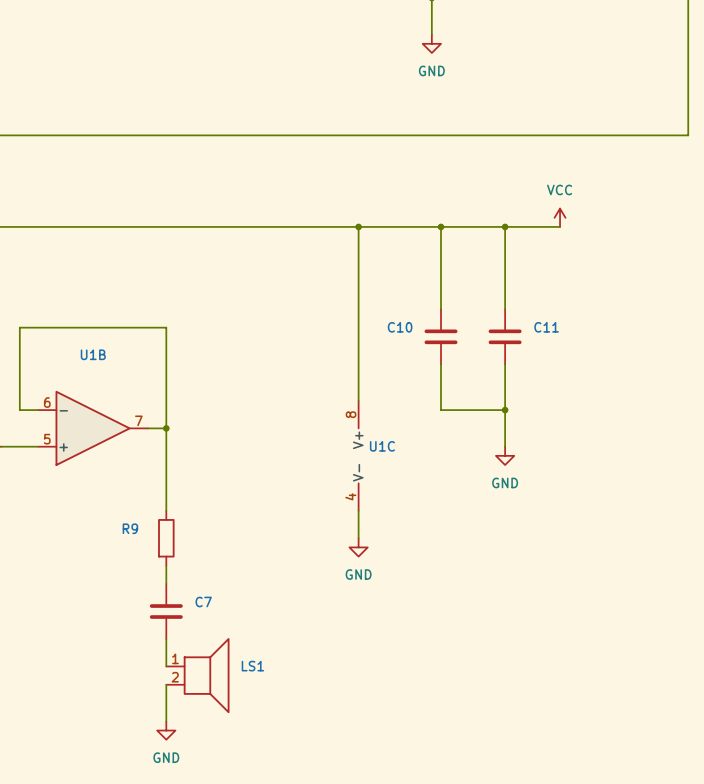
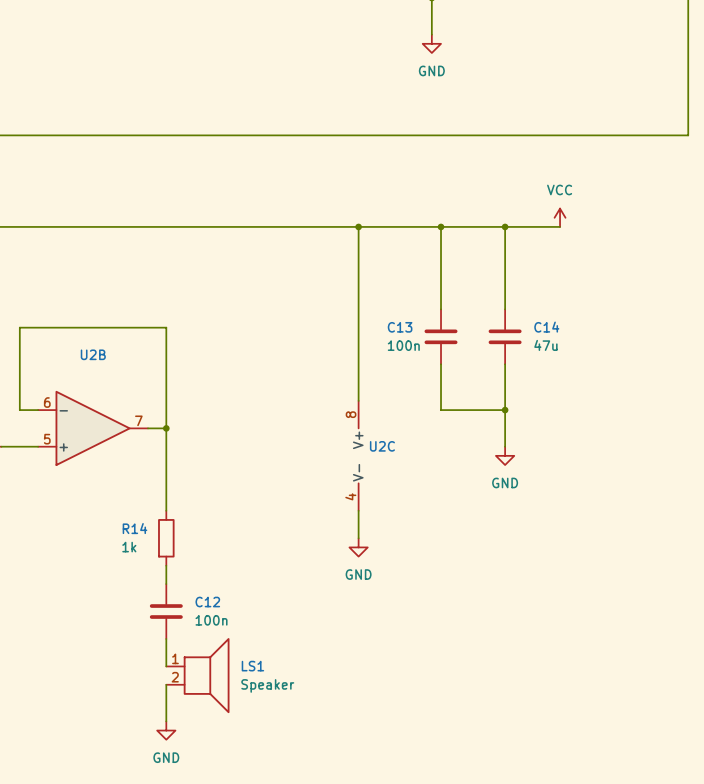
C10 name: C10 (400, 327) -> C13 (400, 327)
C11 name: C11 (546, 327) -> C14 (546, 327)
C10 value: none -> 100n (403, 345)
C11 value: none -> 47u (545, 345)
U1B name: U1B (93, 354) -> U2B (93, 354)
U1C name: U1C (382, 446) -> U2C (382, 446)
R9 name: R9 (130, 528) -> R14 (134, 528)
R9 value: none -> 1k (129, 547)
C7 name: C7 (203, 602) -> C12 (207, 602)
C7 value: none -> 100n (211, 620)
LS1 value: none -> Speaker (267, 685)

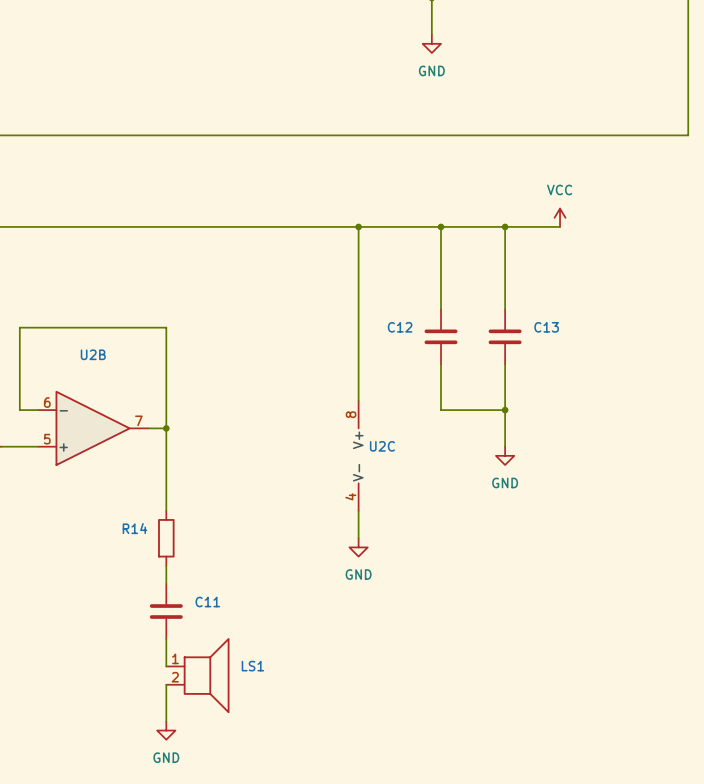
C13 name: C13 (400, 327) -> C12 (400, 327)
C14 name: C14 (546, 327) -> C13 (546, 327)
C13 value: 100n (403, 345) -> none
C14 value: 47u (545, 345) -> none
R14 value: 1k (129, 547) -> none
C12 name: C12 (207, 602) -> C11 (207, 602)
C12 value: 100n (211, 620) -> none
LS1 value: Speaker (267, 685) -> none

